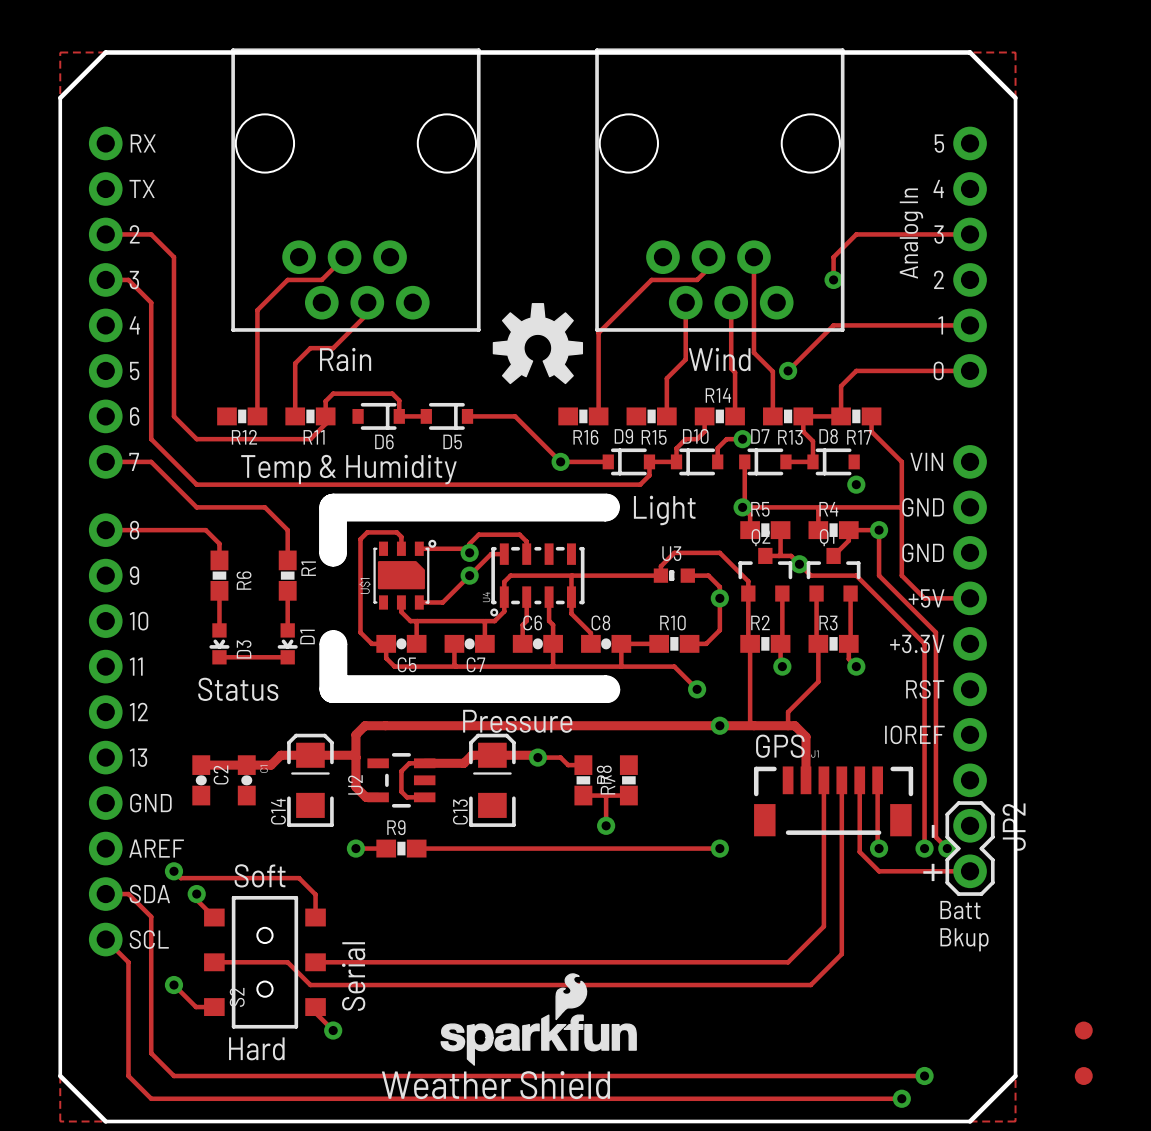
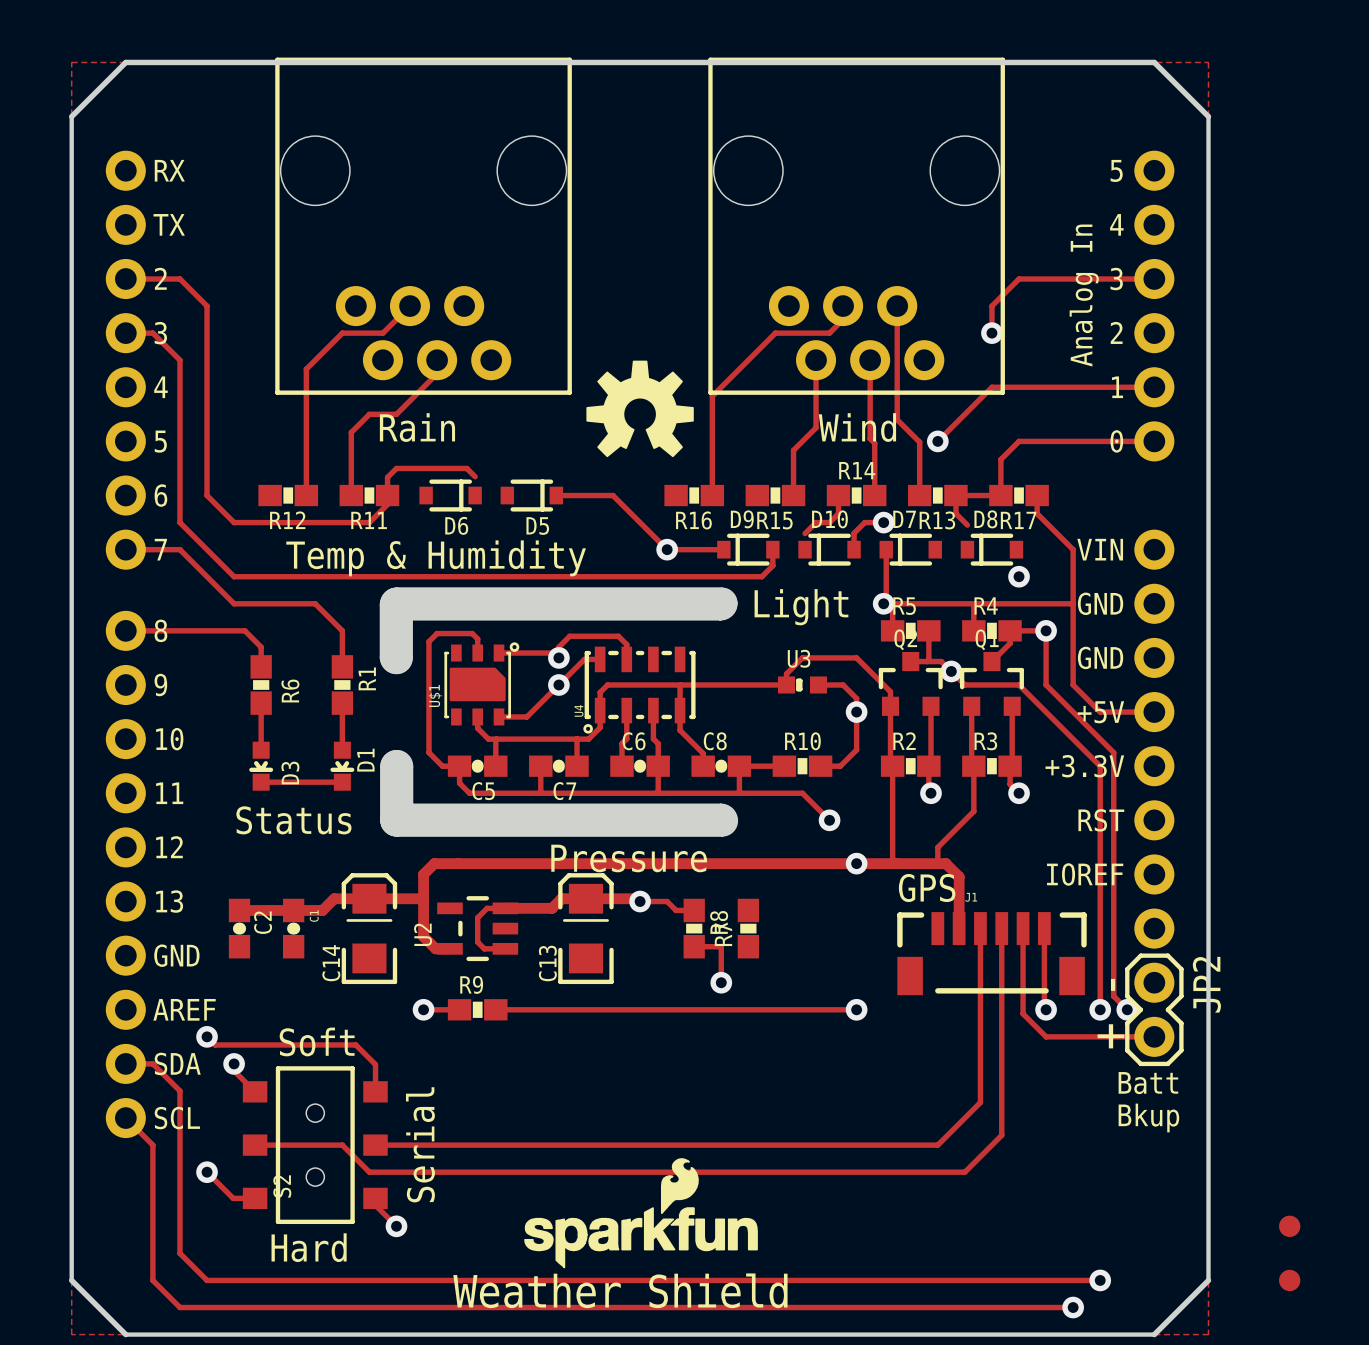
track: (399, 400) (399, 416) (426, 416) -> none
track: (812, 441) (812, 461) (785, 461) -> none
track: (676, 448) (676, 461) (649, 461) -> none
track: (606, 795) (628, 795) -> none

